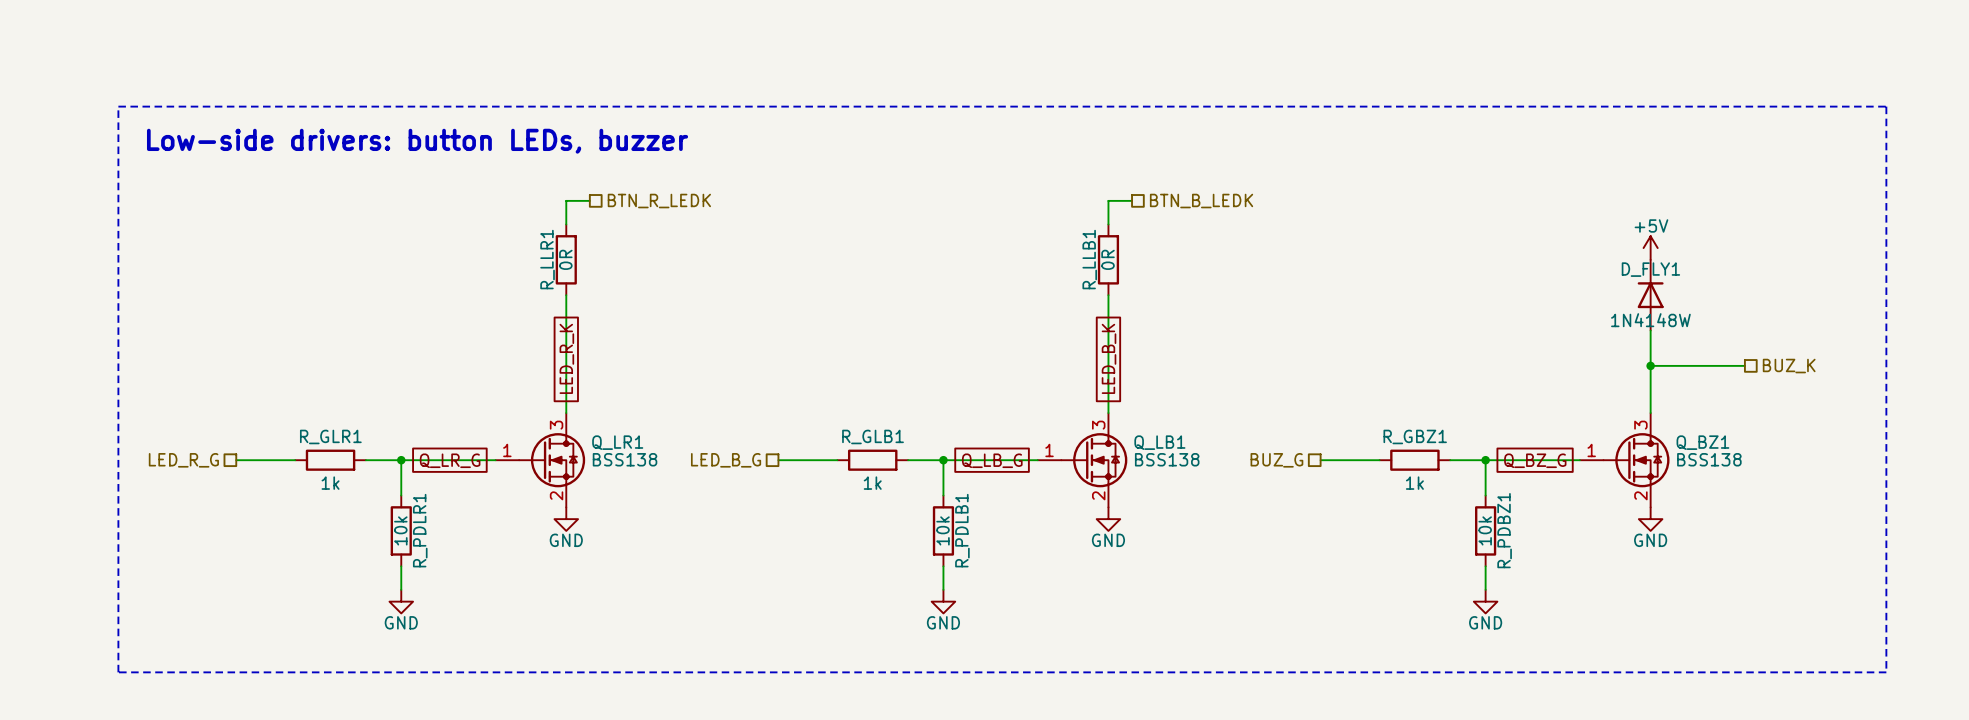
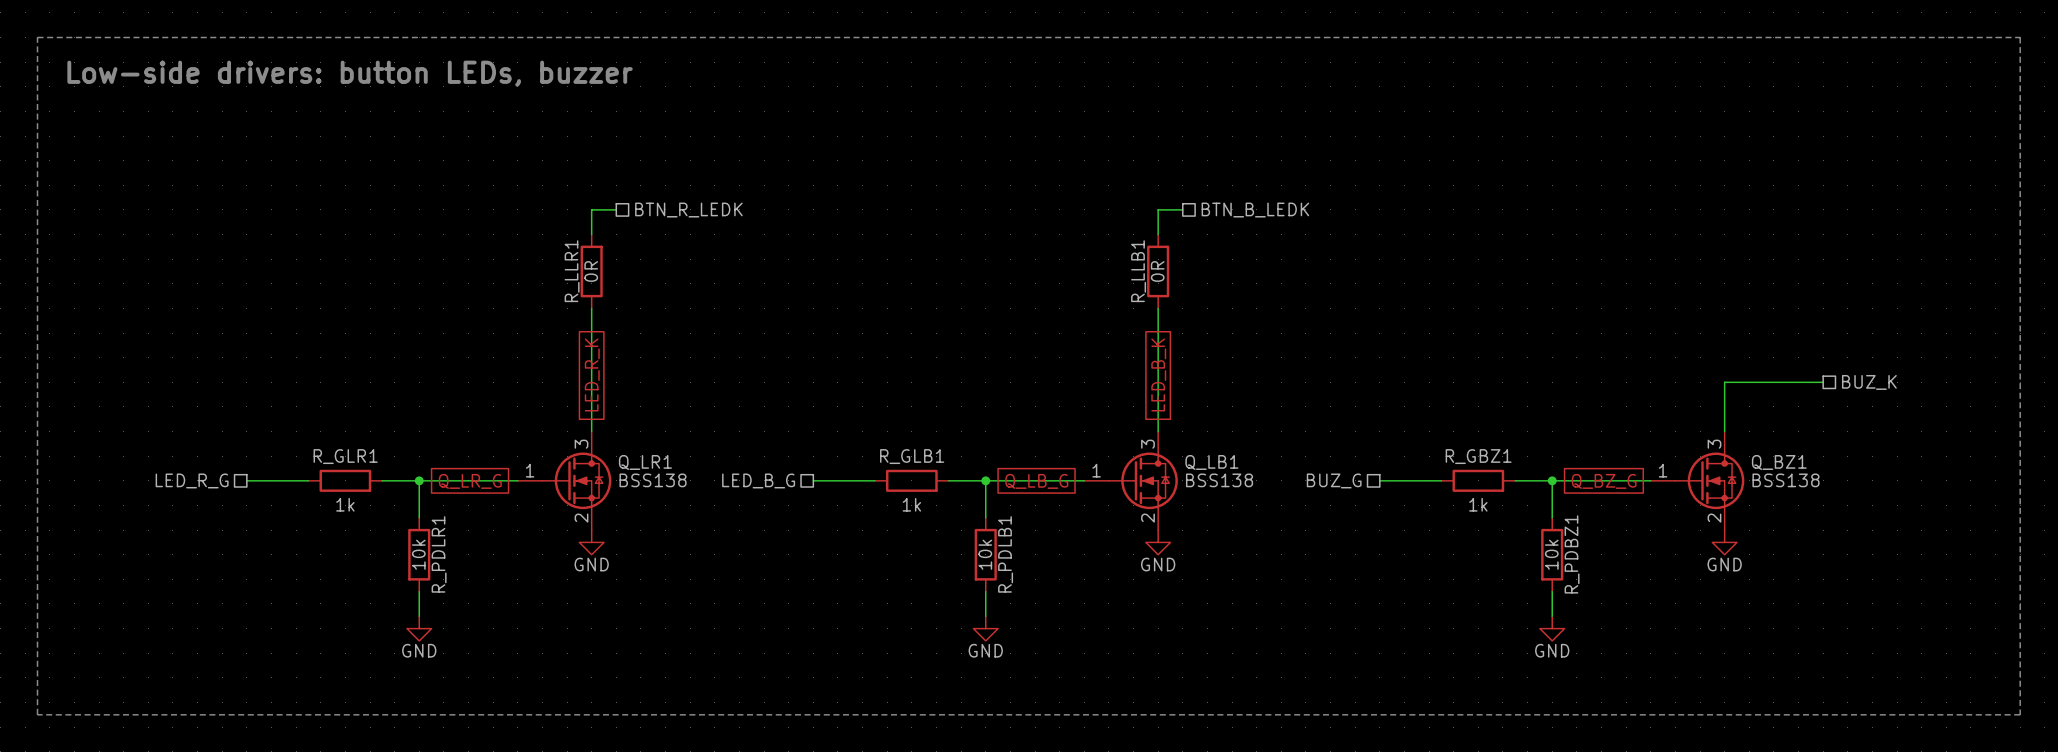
line: (118, 106) (1886, 106) (1886, 672) (118, 672) (118, 106) -> (37, 37) (37, 714) (2020, 714) (2020, 37) (37, 37)
text position: Low-side drivers: button LEDs, buzzer (417, 141) -> Low-side drivers: button LEDs, buzzer (350, 73)
power symbol: +5V (1650, 248) -> none
D_FLY1: 1N4148W (1650, 295) -> none
wire: (1650, 330) (1650, 365) -> none
junction: (1650, 365) -> none

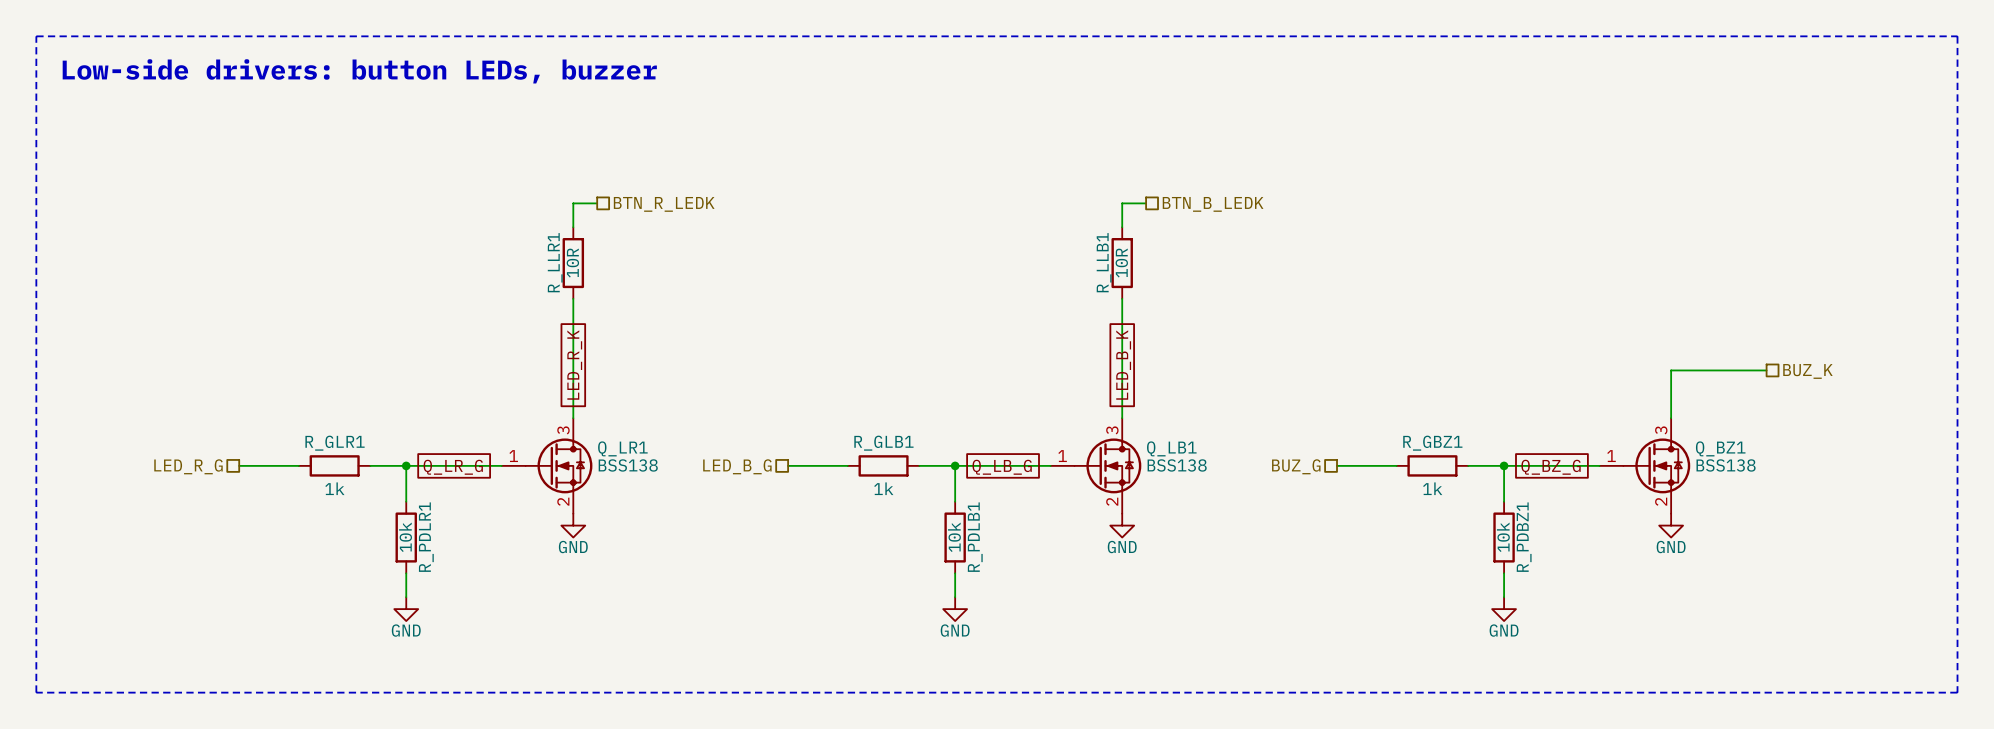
R_LLR1 value: 0R (591, 271) -> 10R (572, 263)
R_LLB1 value: 0R (1157, 271) -> 10R (1121, 263)

